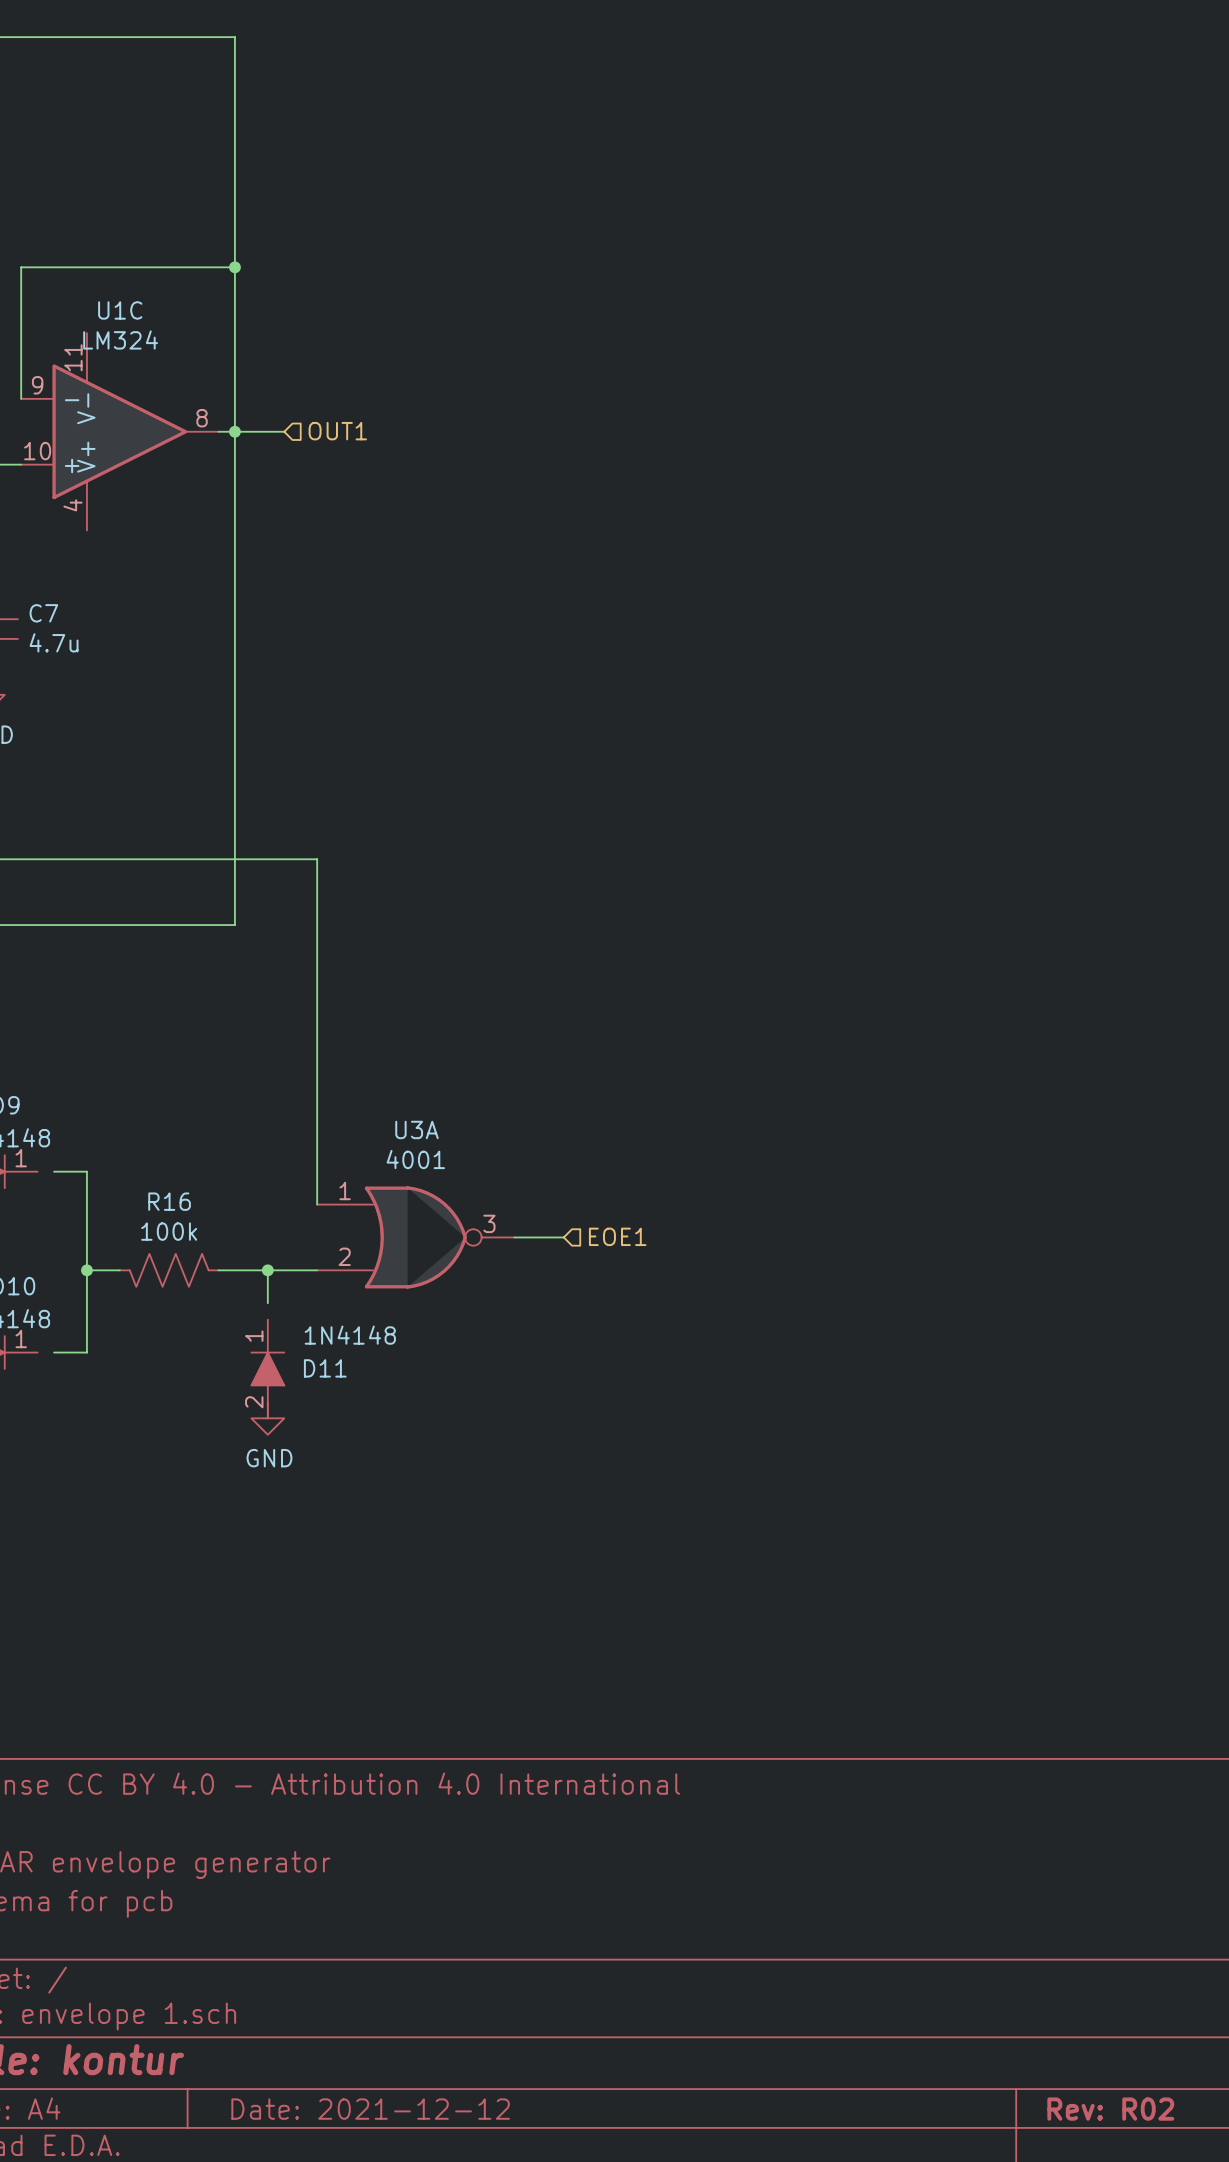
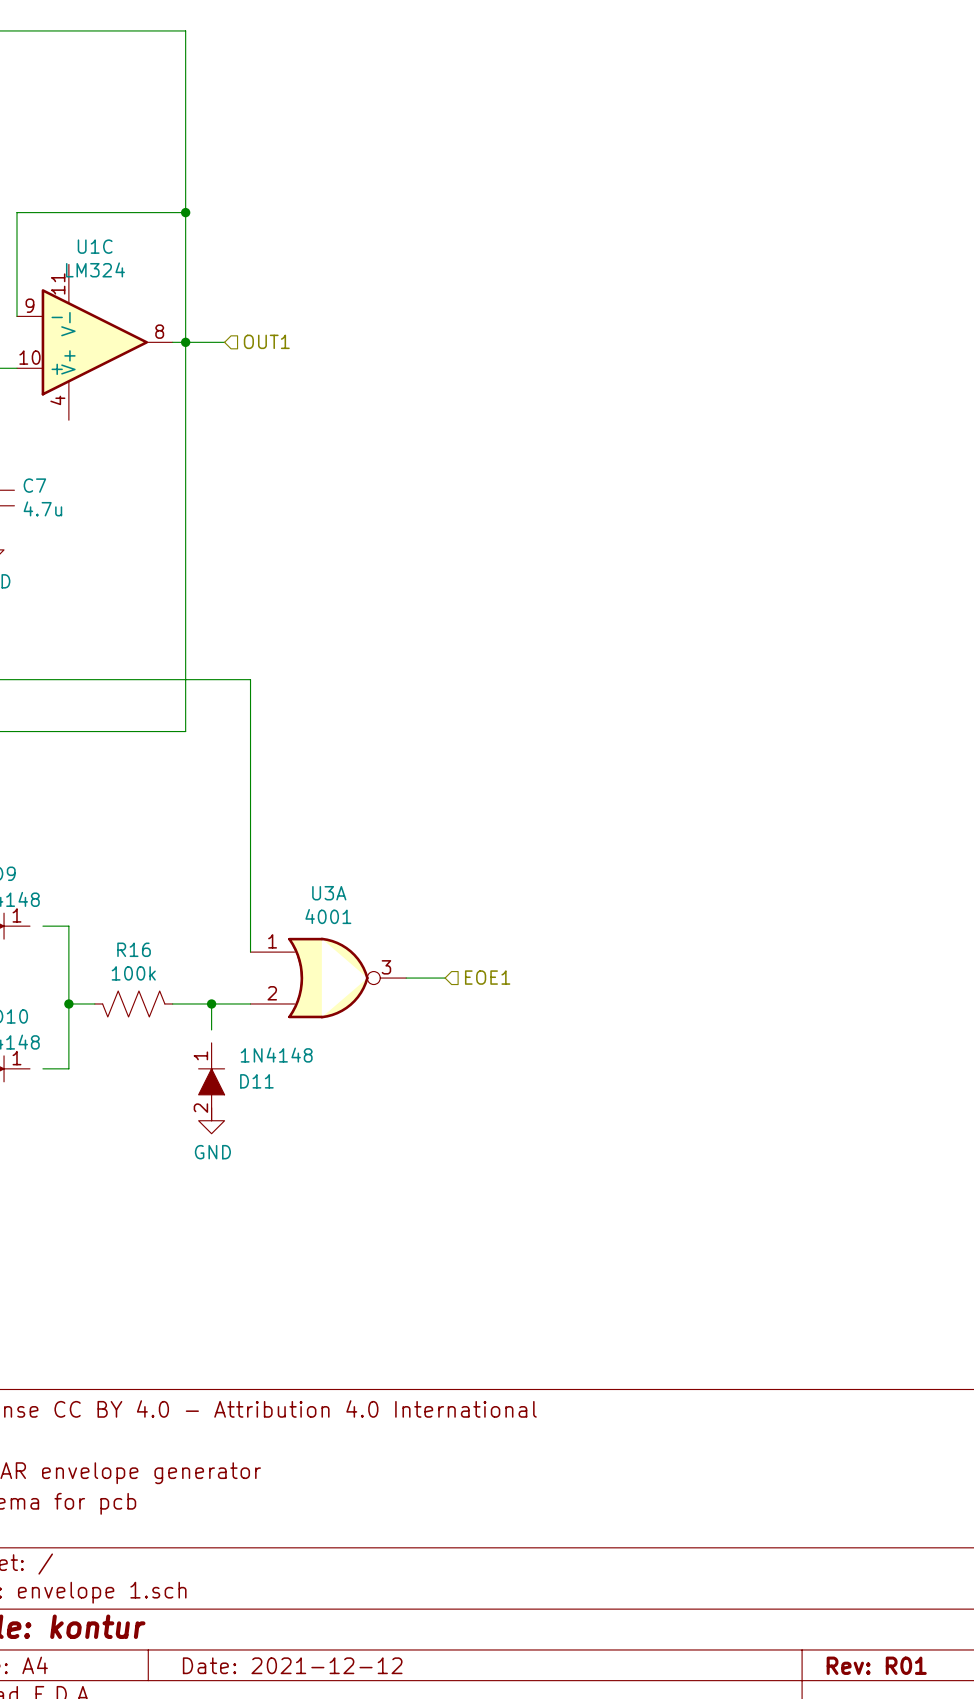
title block: Rev: R02 (1110, 2109) -> Rev: R01 (876, 1665)

